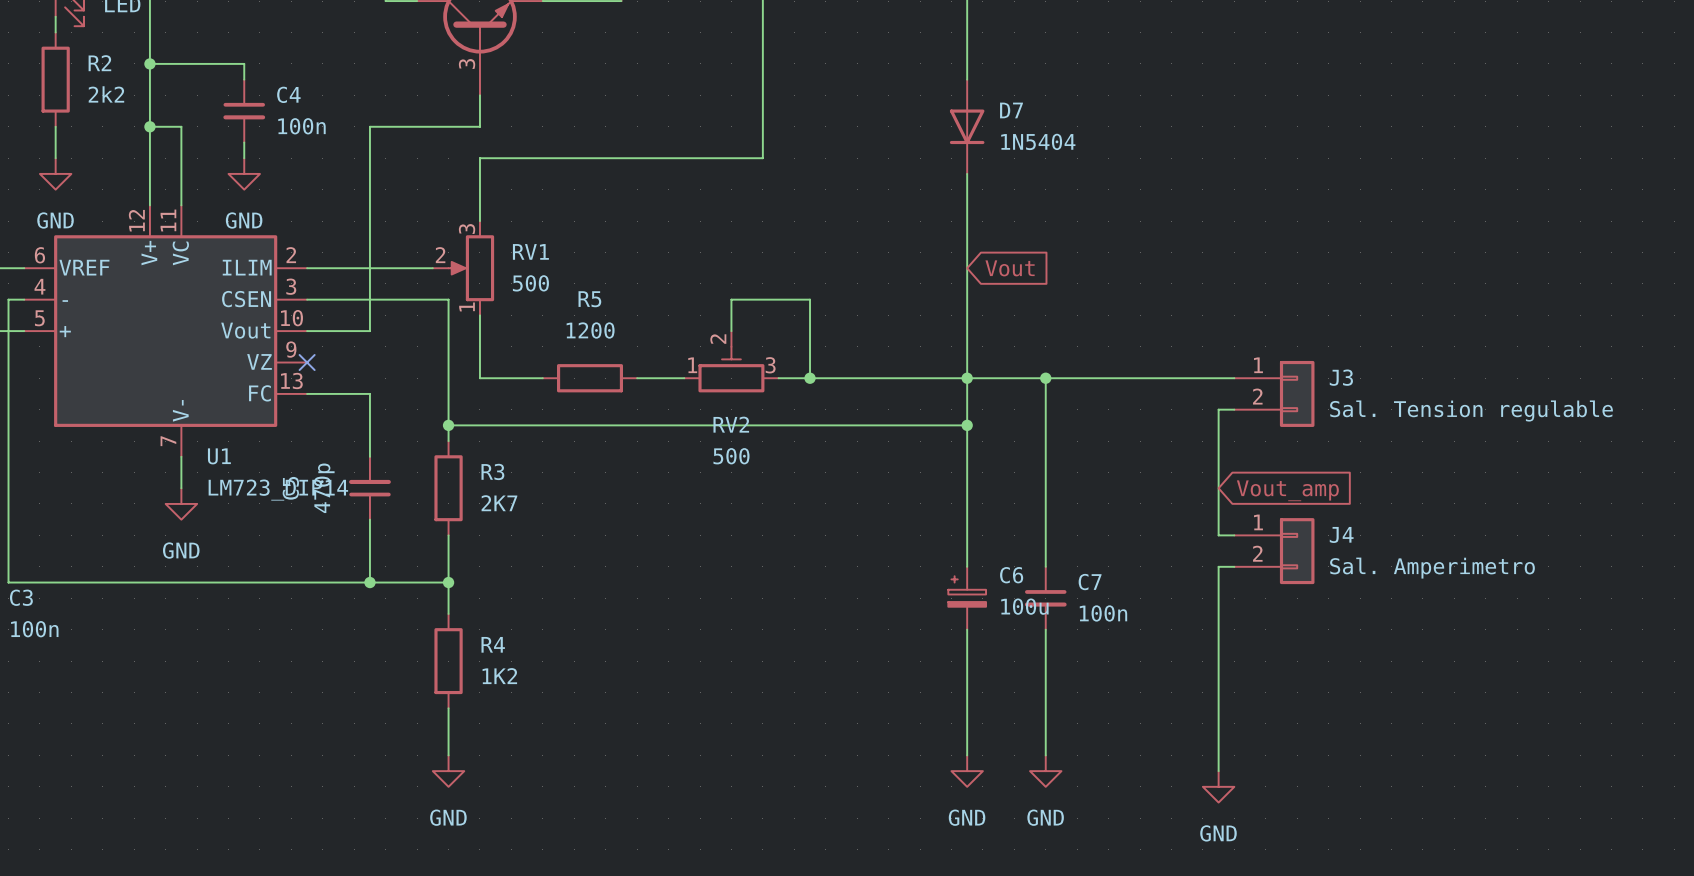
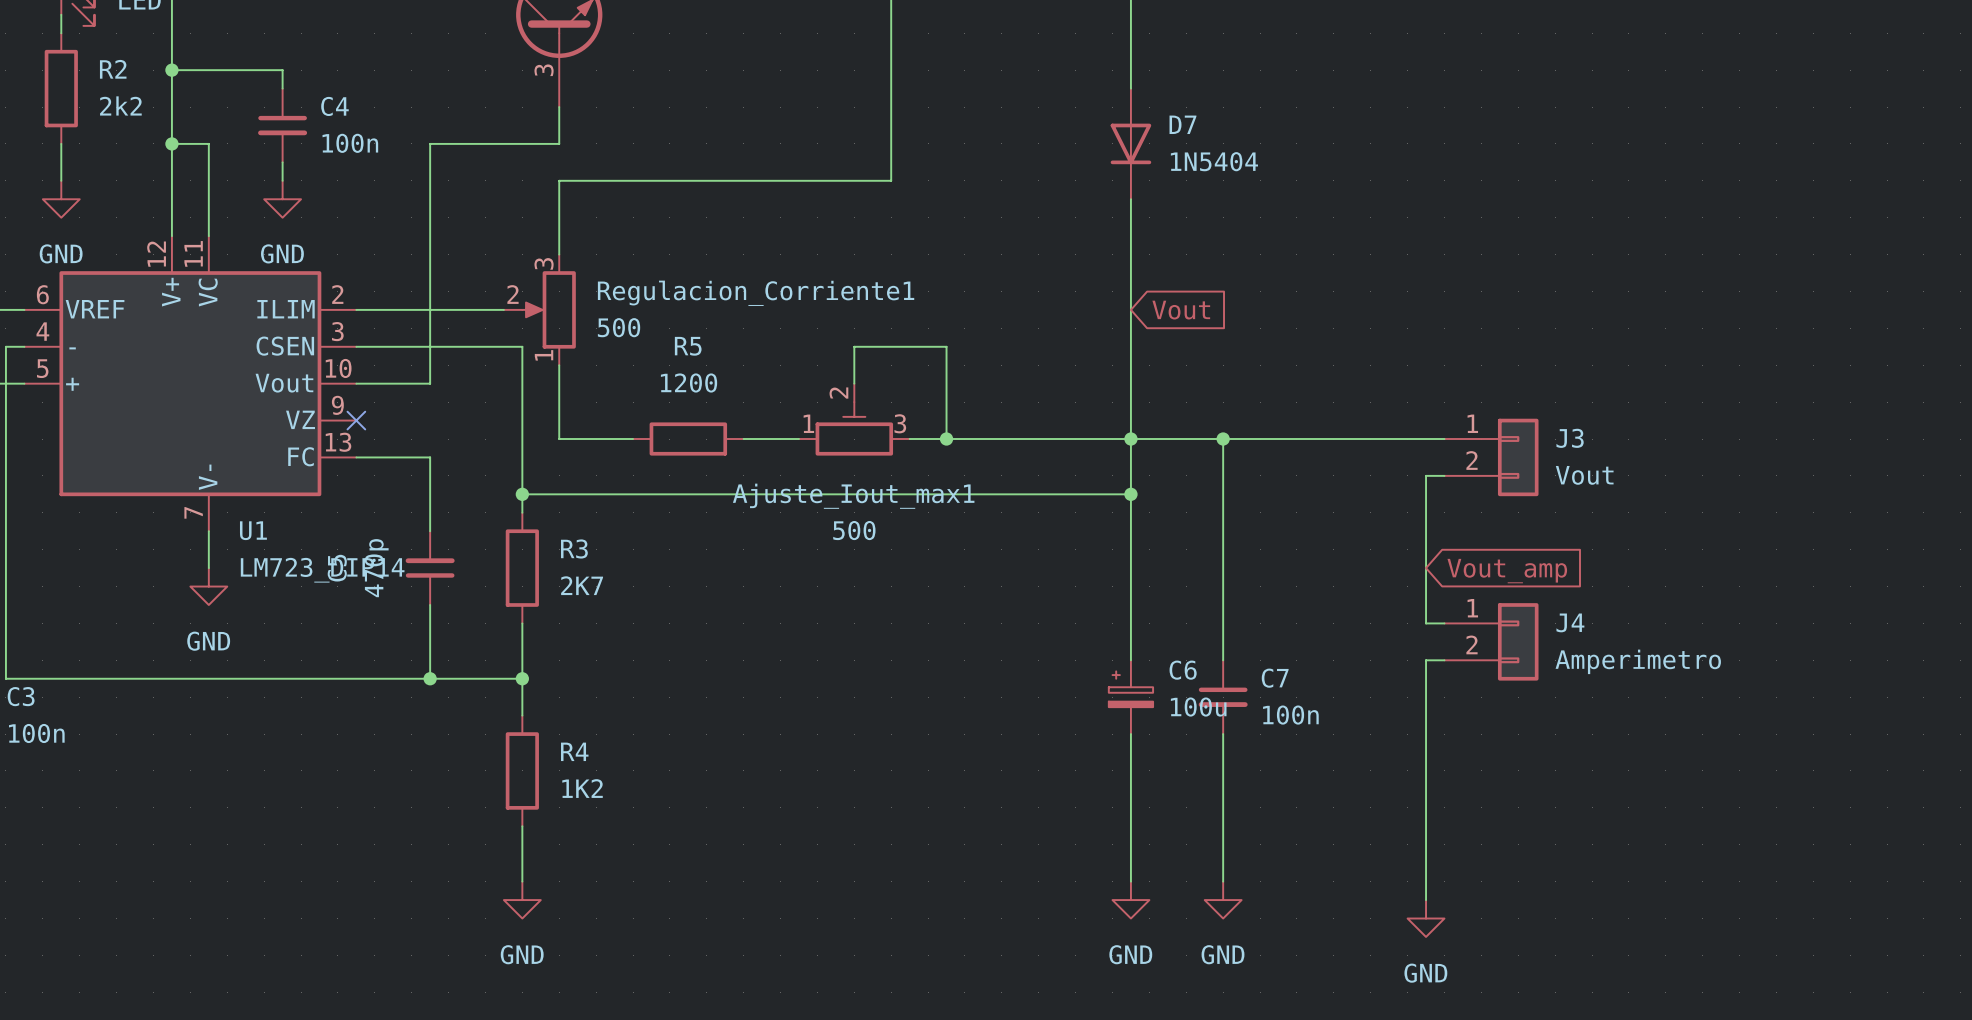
RV1 name: RV1 (530, 251) -> Regulacion_Corriente1 (756, 293)
J3 value: Sal. Tension regulable (1471, 411) -> Vout (1584, 475)
RV2 name: RV2 (731, 424) -> Ajuste_Iout_max1 (853, 496)
J4 value: Sal. Amperimetro (1432, 568) -> Amperimetro (1638, 661)

